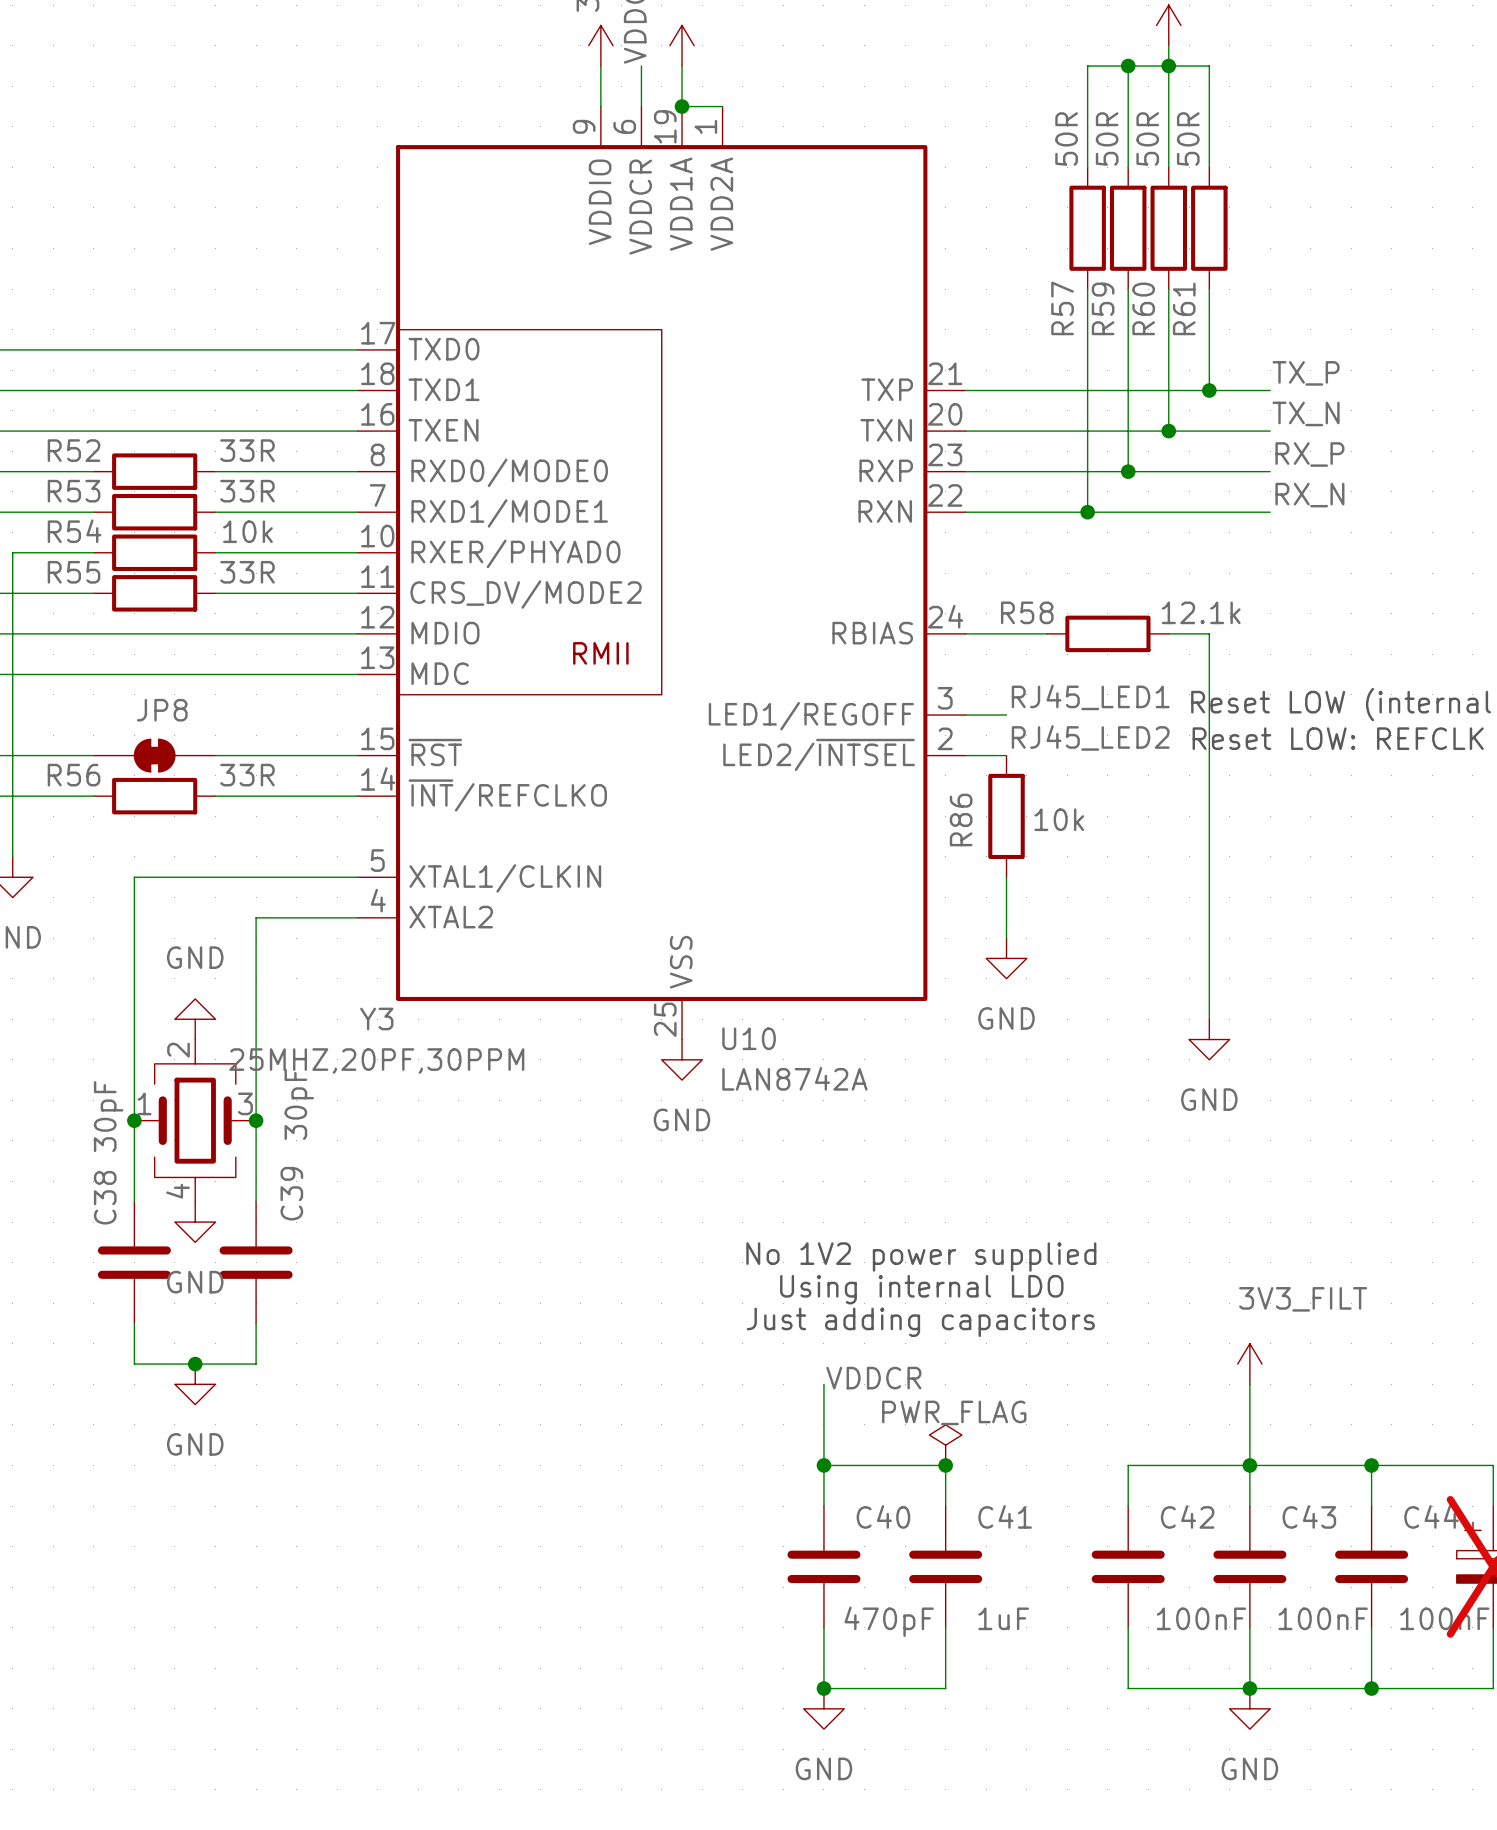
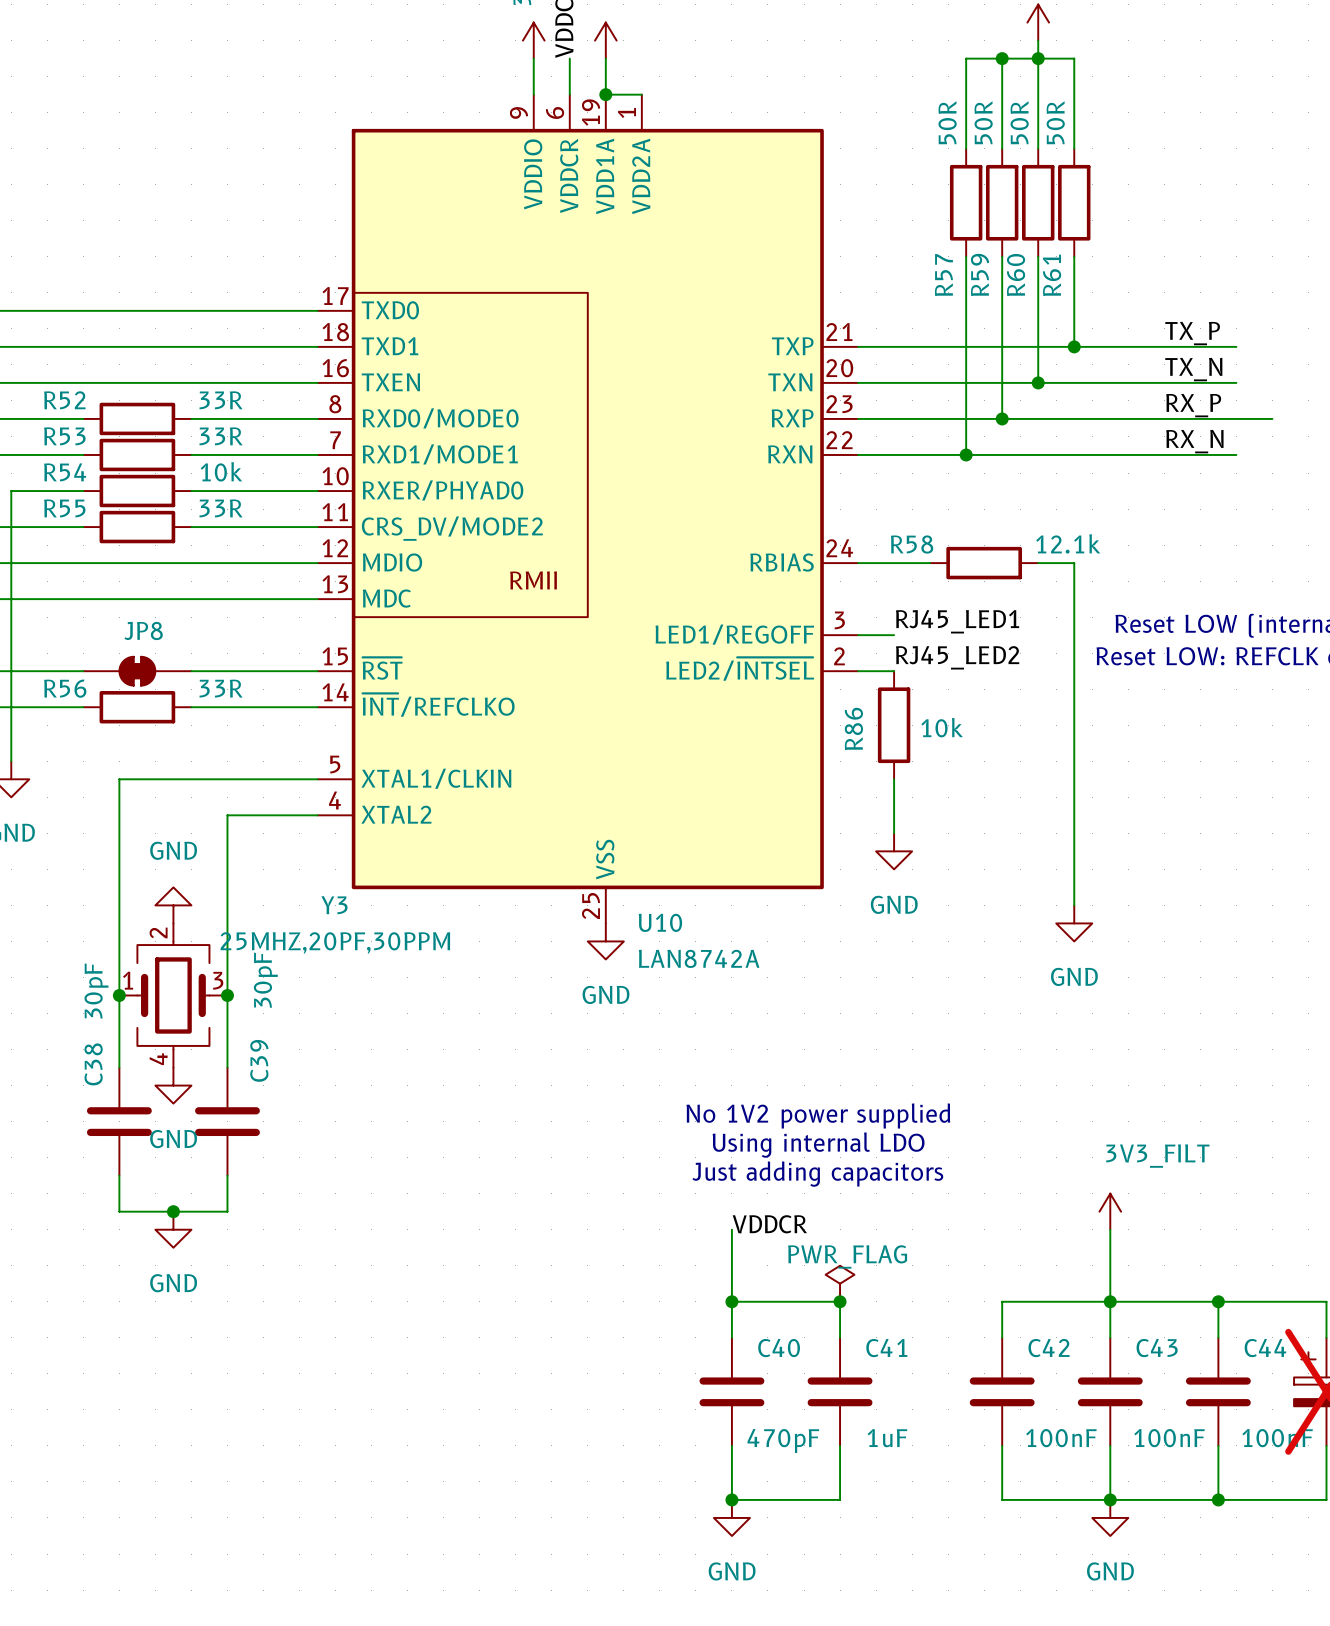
label position: TX_P (1306, 373) -> TX_P (1192, 333)
wire: none -> (1128, 346) (1236, 346)
label position: TX_N (1306, 413) -> TX_N (1193, 369)
wire: none -> (1128, 382) (1236, 382)
label position: RX_P (1309, 454) -> RX_P (1193, 405)
wire: none -> (1128, 418) (1272, 418)
label position: RX_N (1309, 495) -> RX_N (1194, 441)
wire: none -> (1128, 454) (1236, 454)

